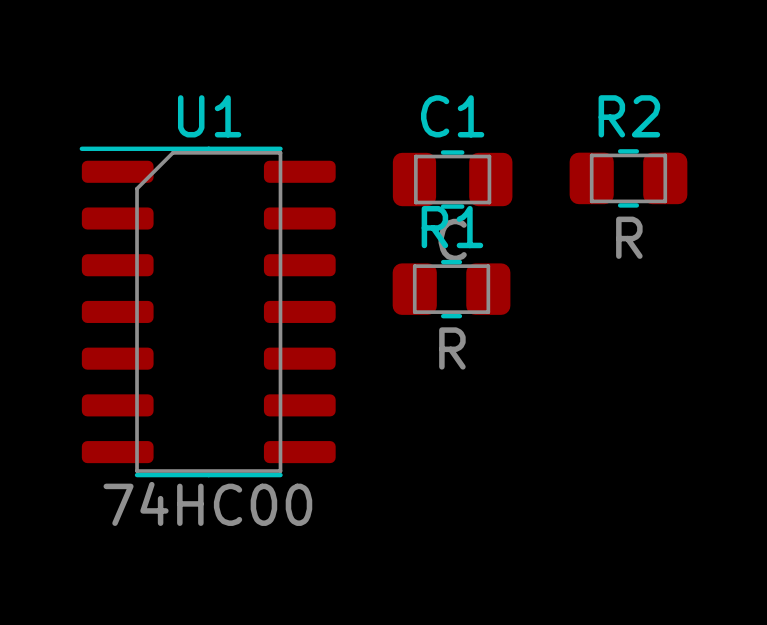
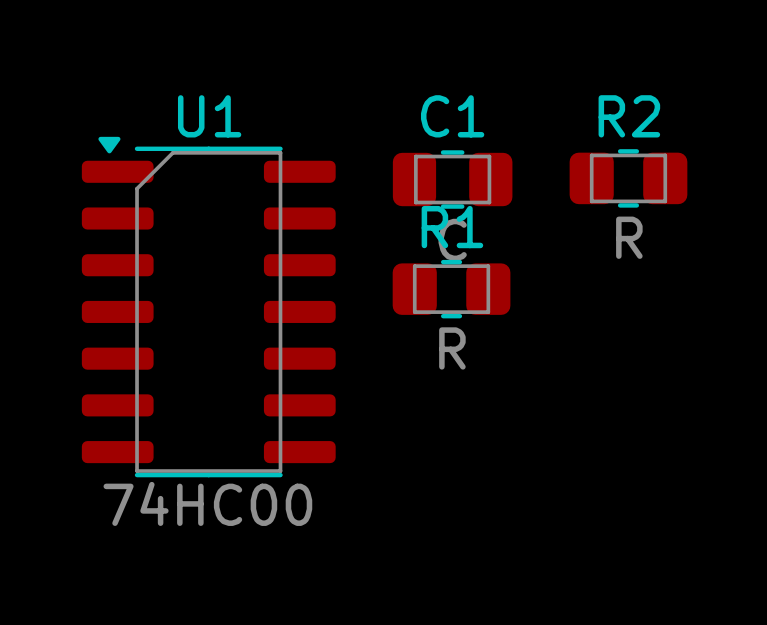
U1 footprint: [79, 146, 336, 478] -> [81, 136, 336, 478]

